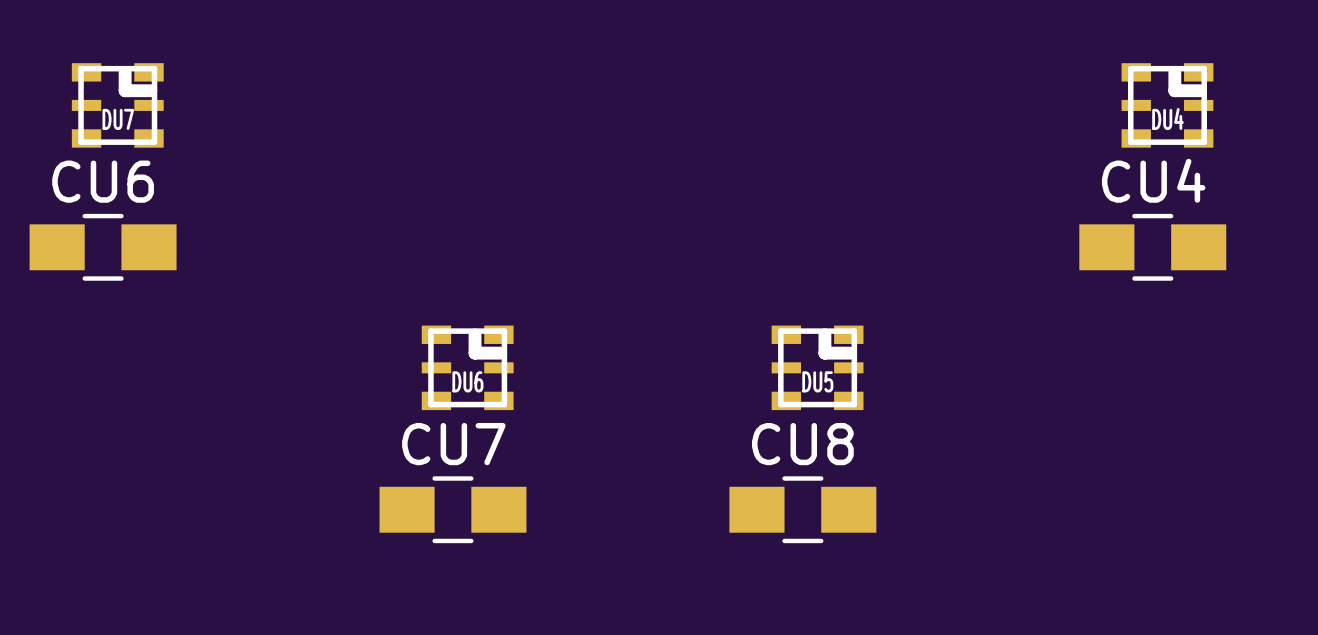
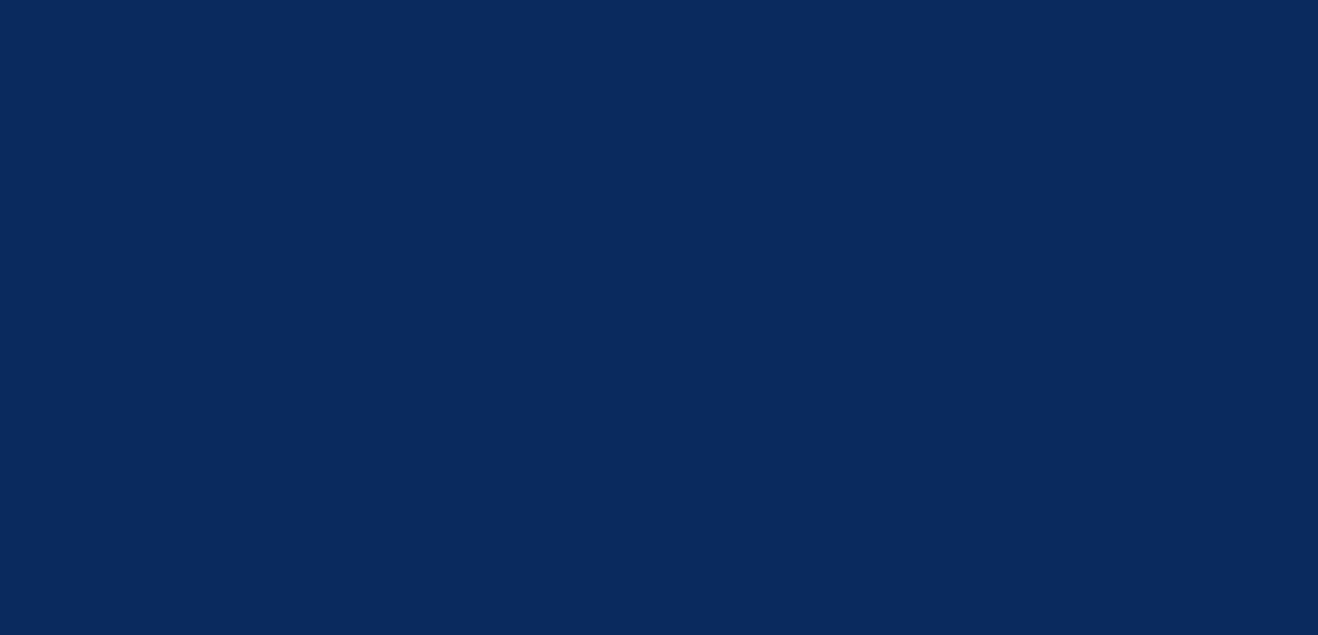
DU7: (117, 105) -> none
DU4: (1167, 105) -> none
CU6: (103, 247) -> none
CU4: (1152, 247) -> none
DU6: (467, 367) -> none
DU5: (817, 367) -> none
CU7: (452, 509) -> none
CU8: (802, 509) -> none

